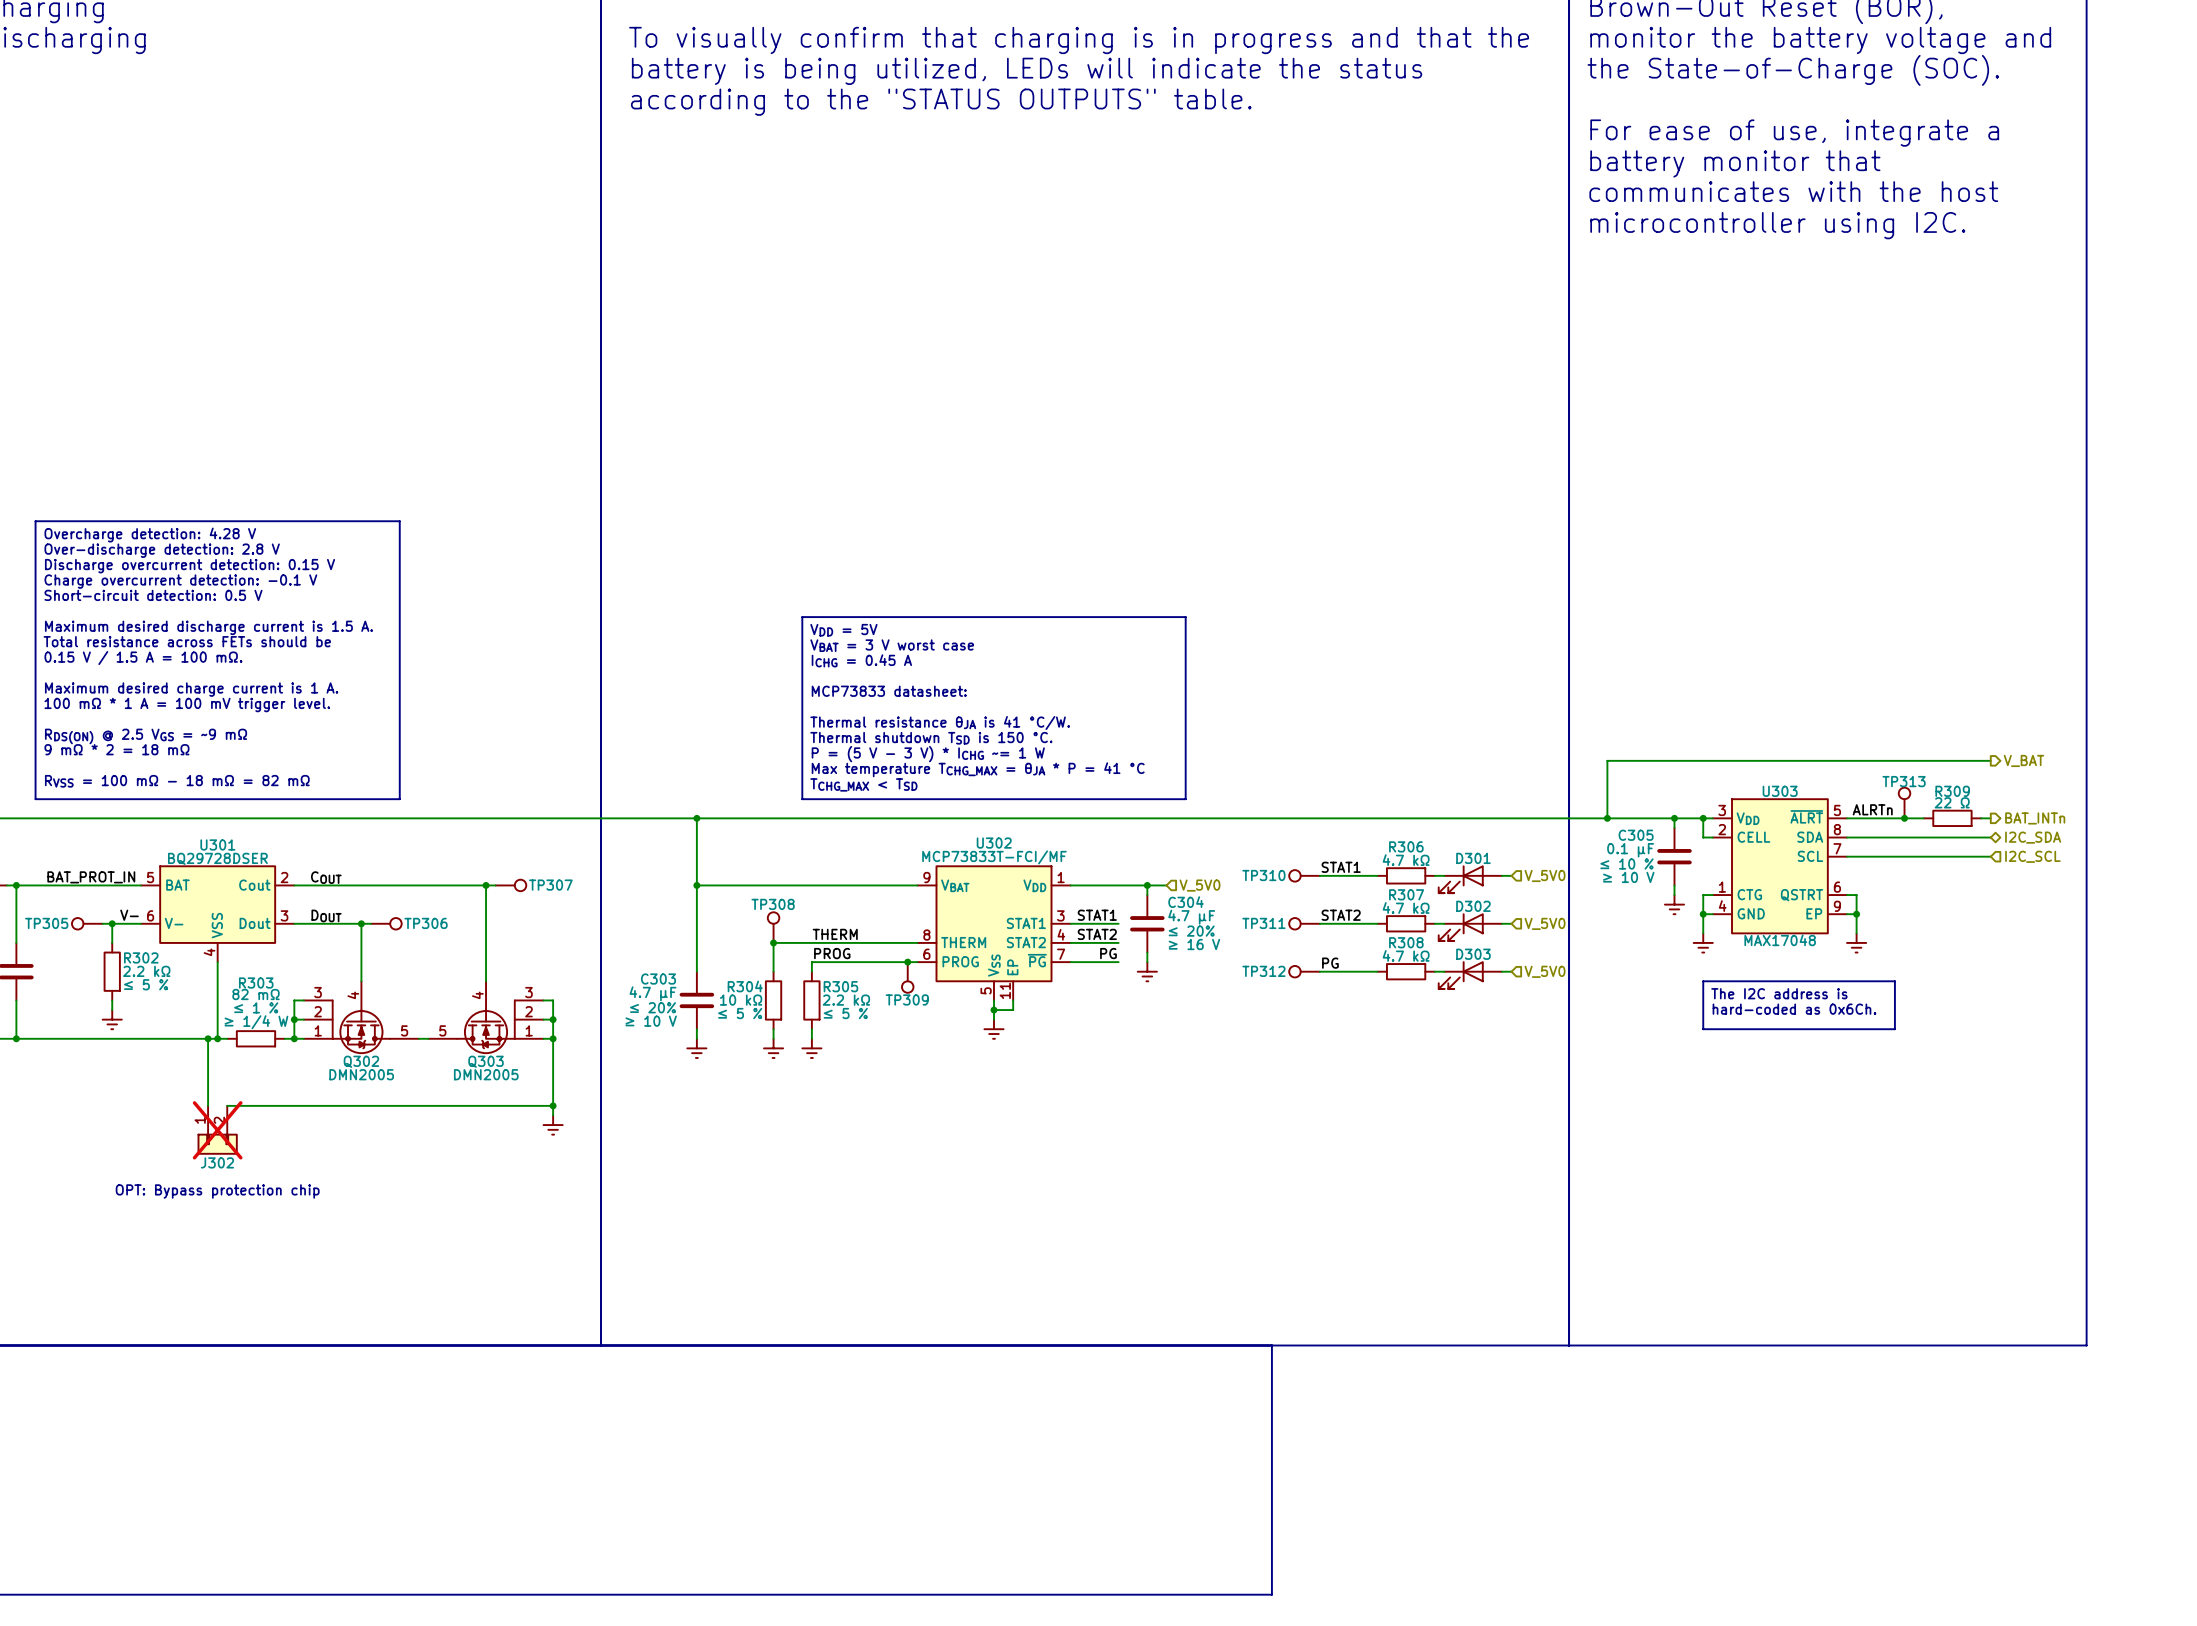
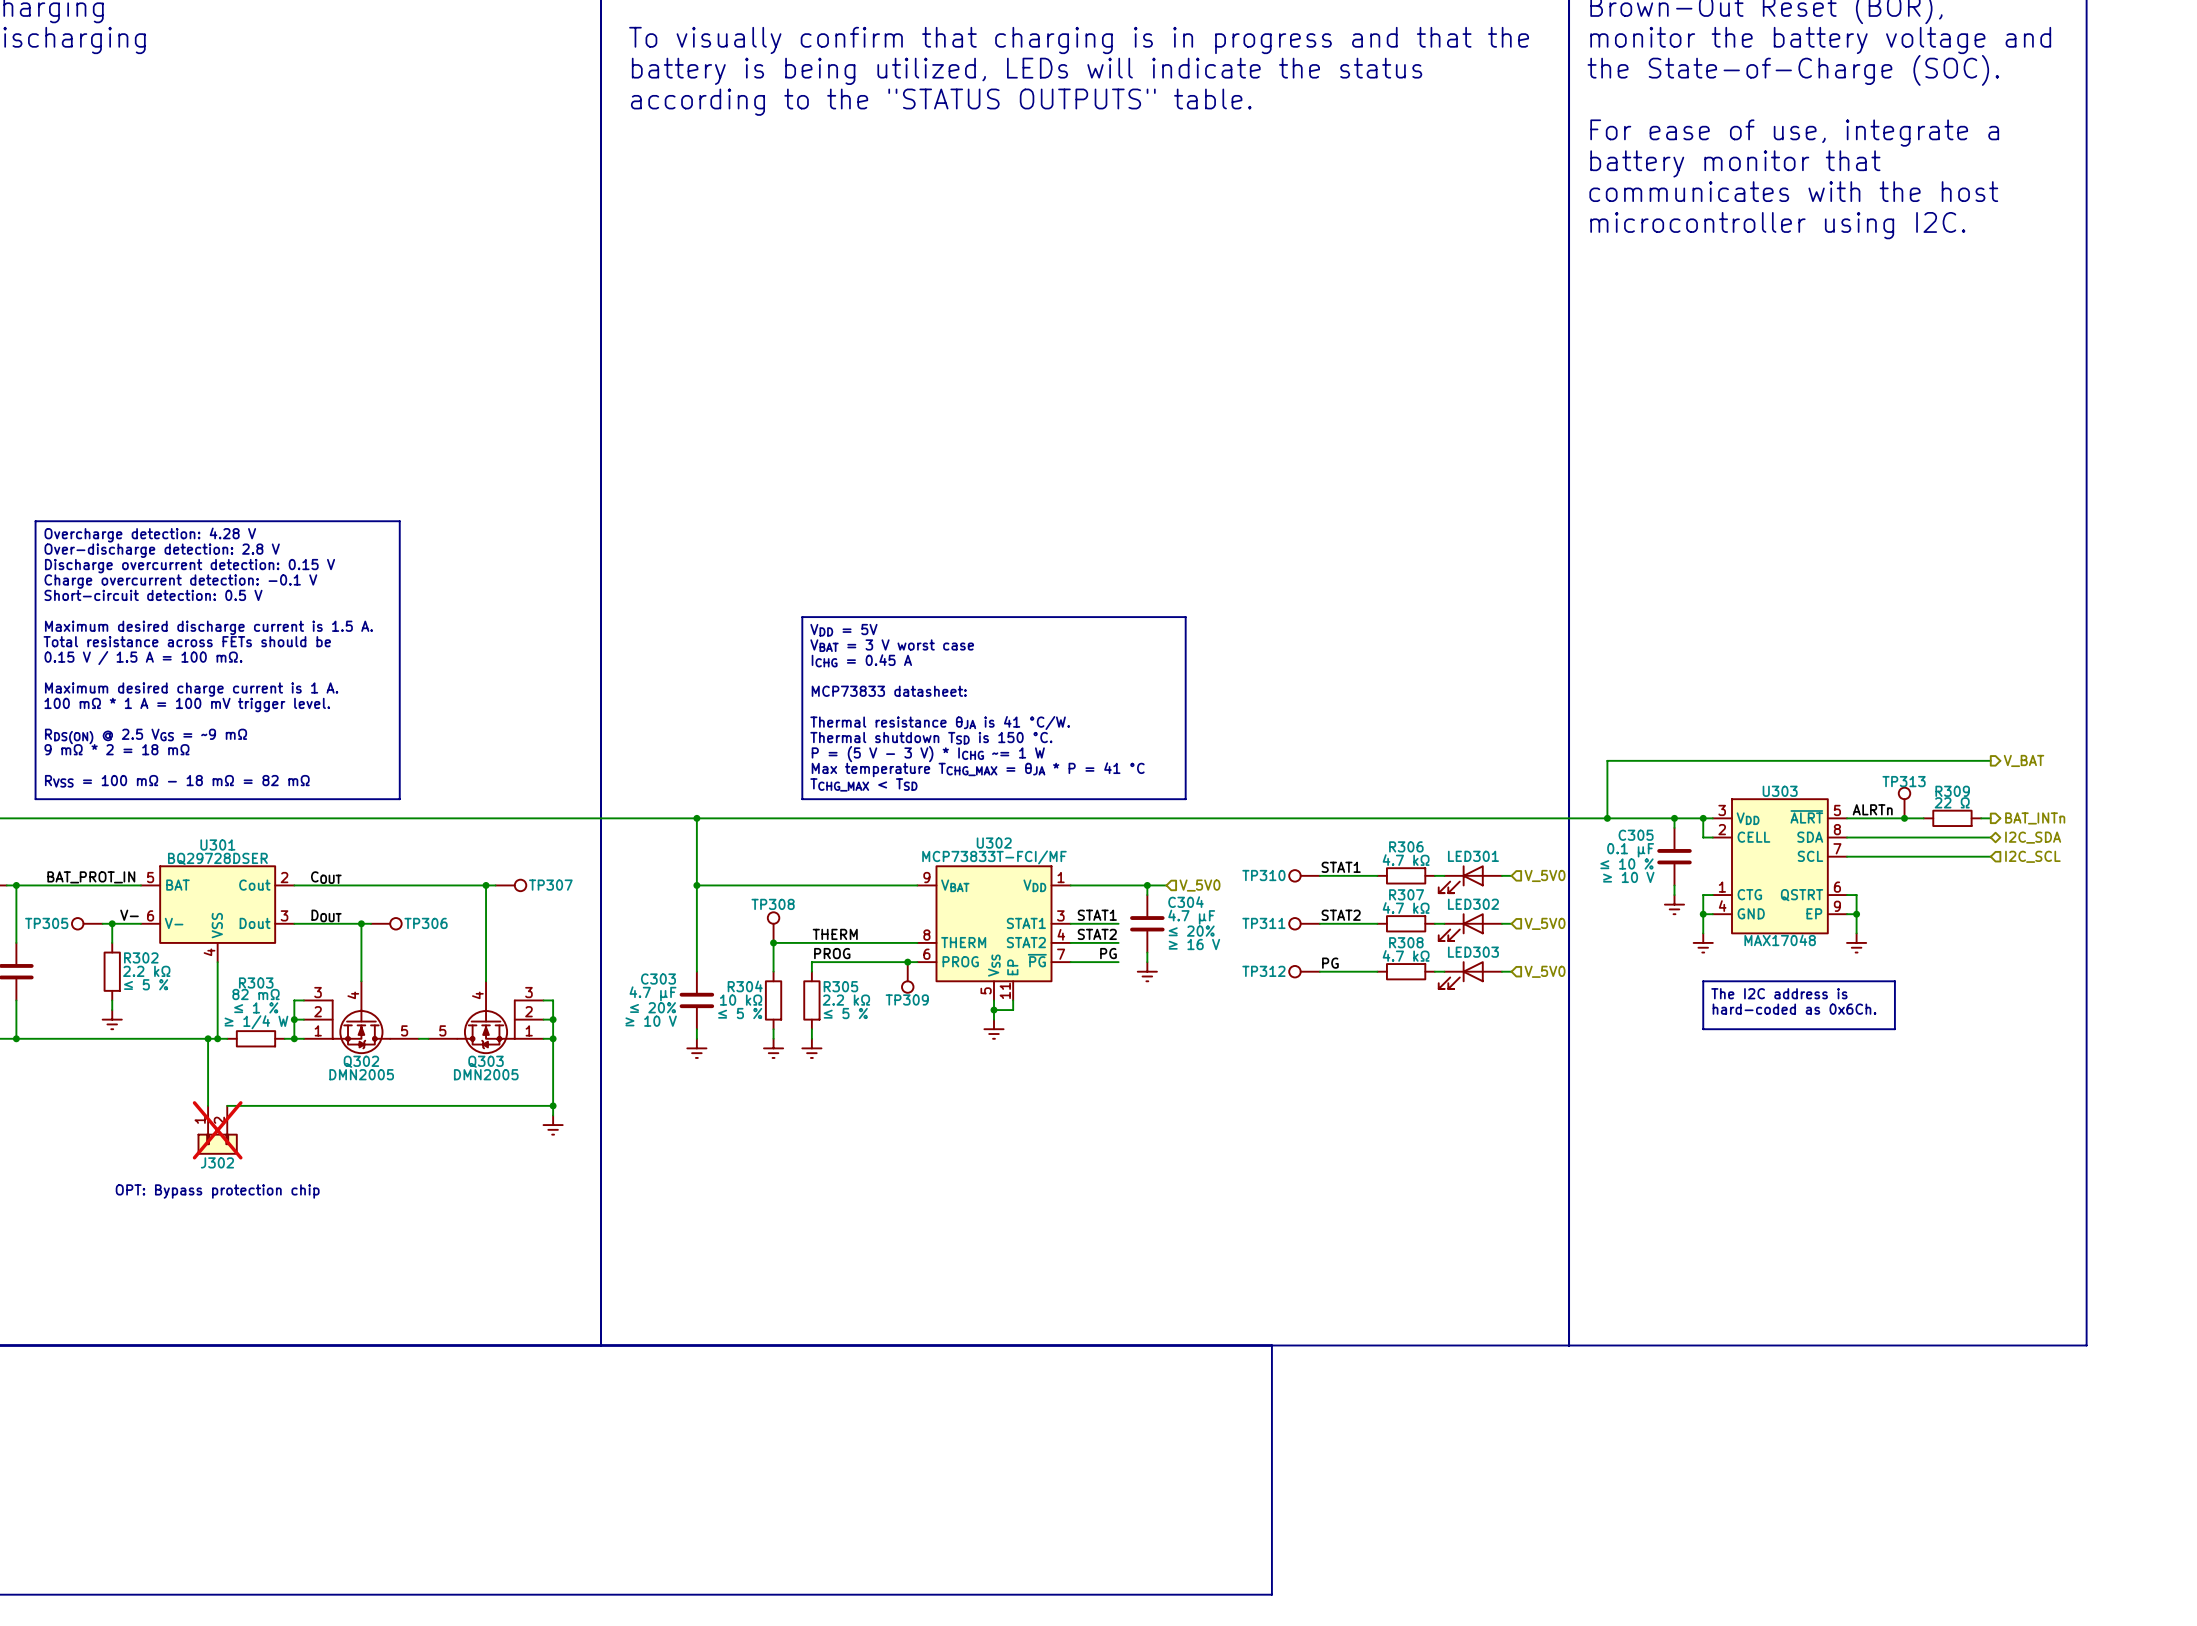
D301 name: D301 (1473, 858) -> LED301 (1473, 856)
D302 name: D302 (1473, 906) -> LED302 (1473, 904)
D303 name: D303 (1473, 954) -> LED303 (1473, 952)

